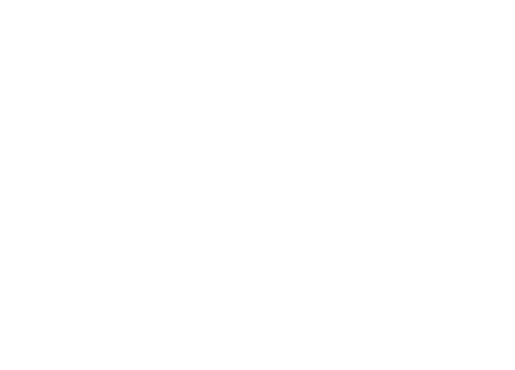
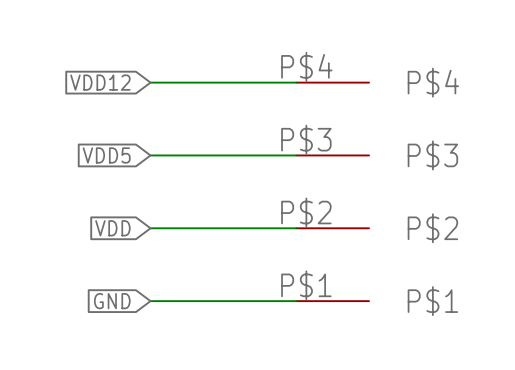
global label: none -> VDD12 (100, 82)
wire: none -> (150, 82) (296, 82)
global label: none -> VDD5 (106, 155)
wire: none -> (150, 155) (296, 155)
part: none -> (332, 191)
global label: none -> VDD (112, 228)
wire: none -> (150, 228) (296, 228)
global label: none -> GND (112, 301)
wire: none -> (150, 301) (296, 301)

